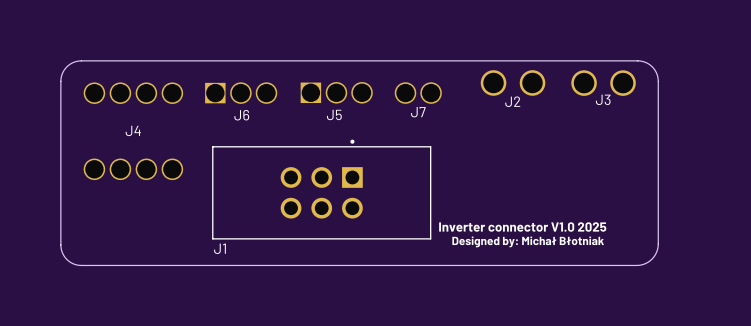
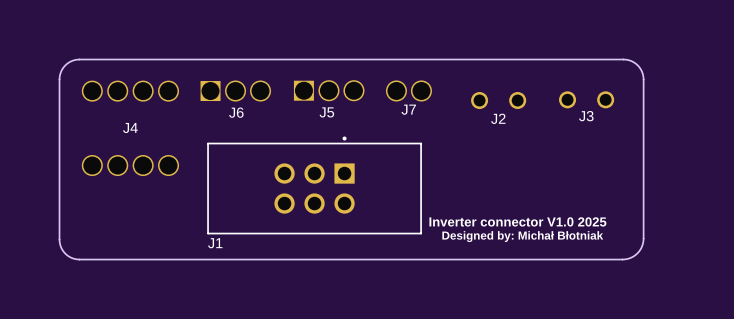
J2 footprint: [480, 70, 546, 96] -> [471, 92, 527, 110]
J3 footprint: [571, 70, 636, 96] -> [559, 91, 615, 109]

